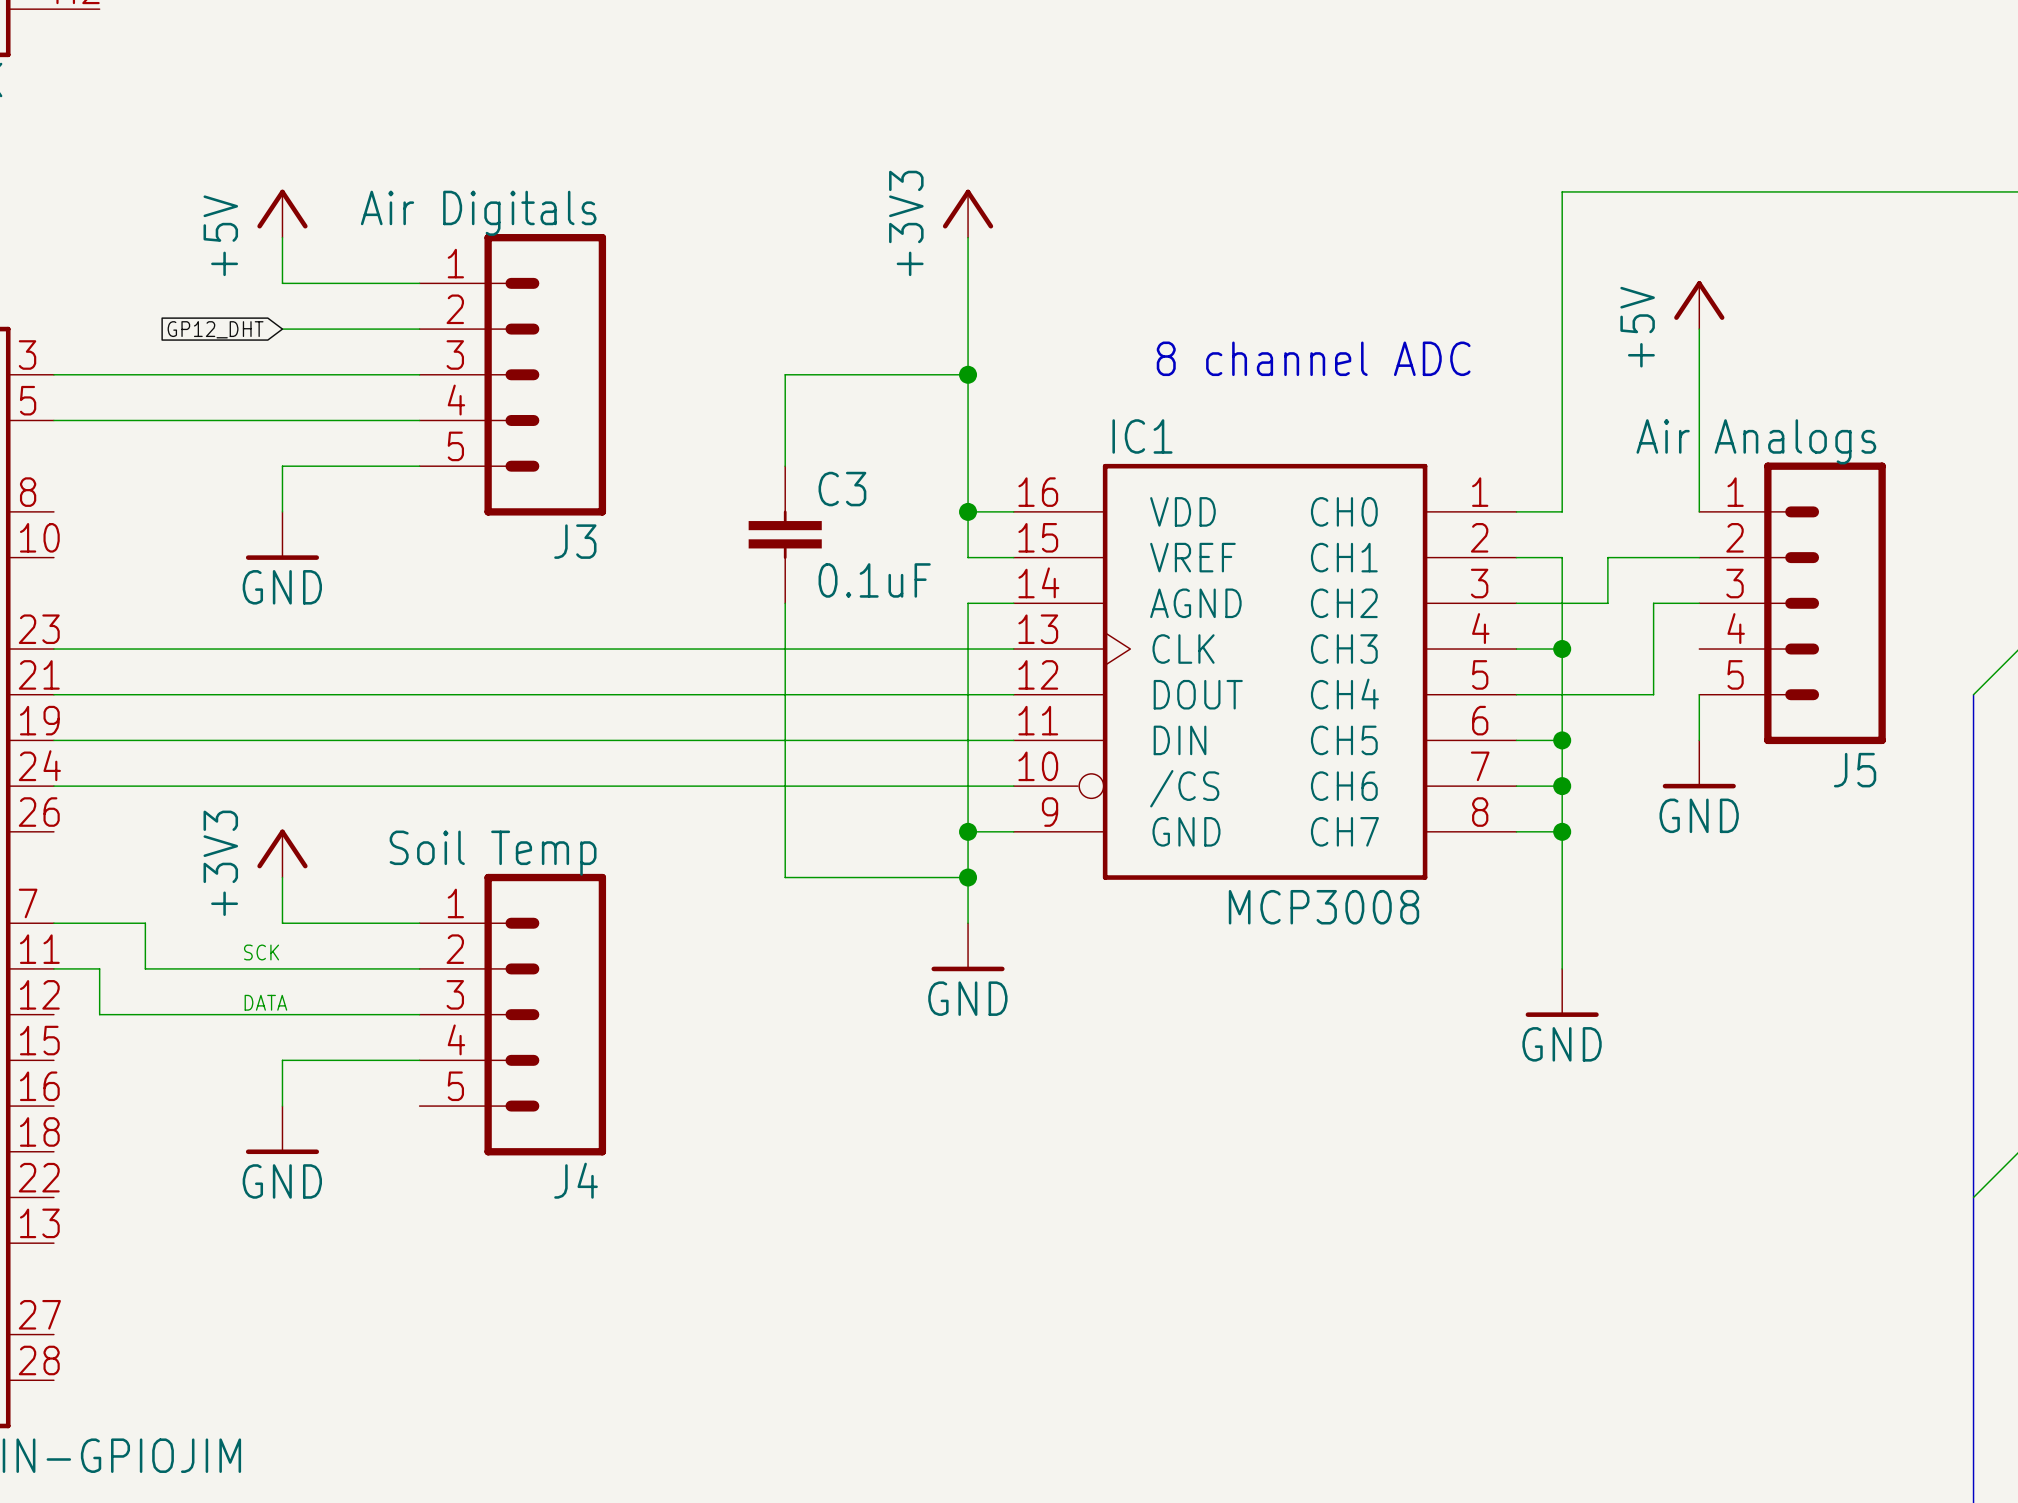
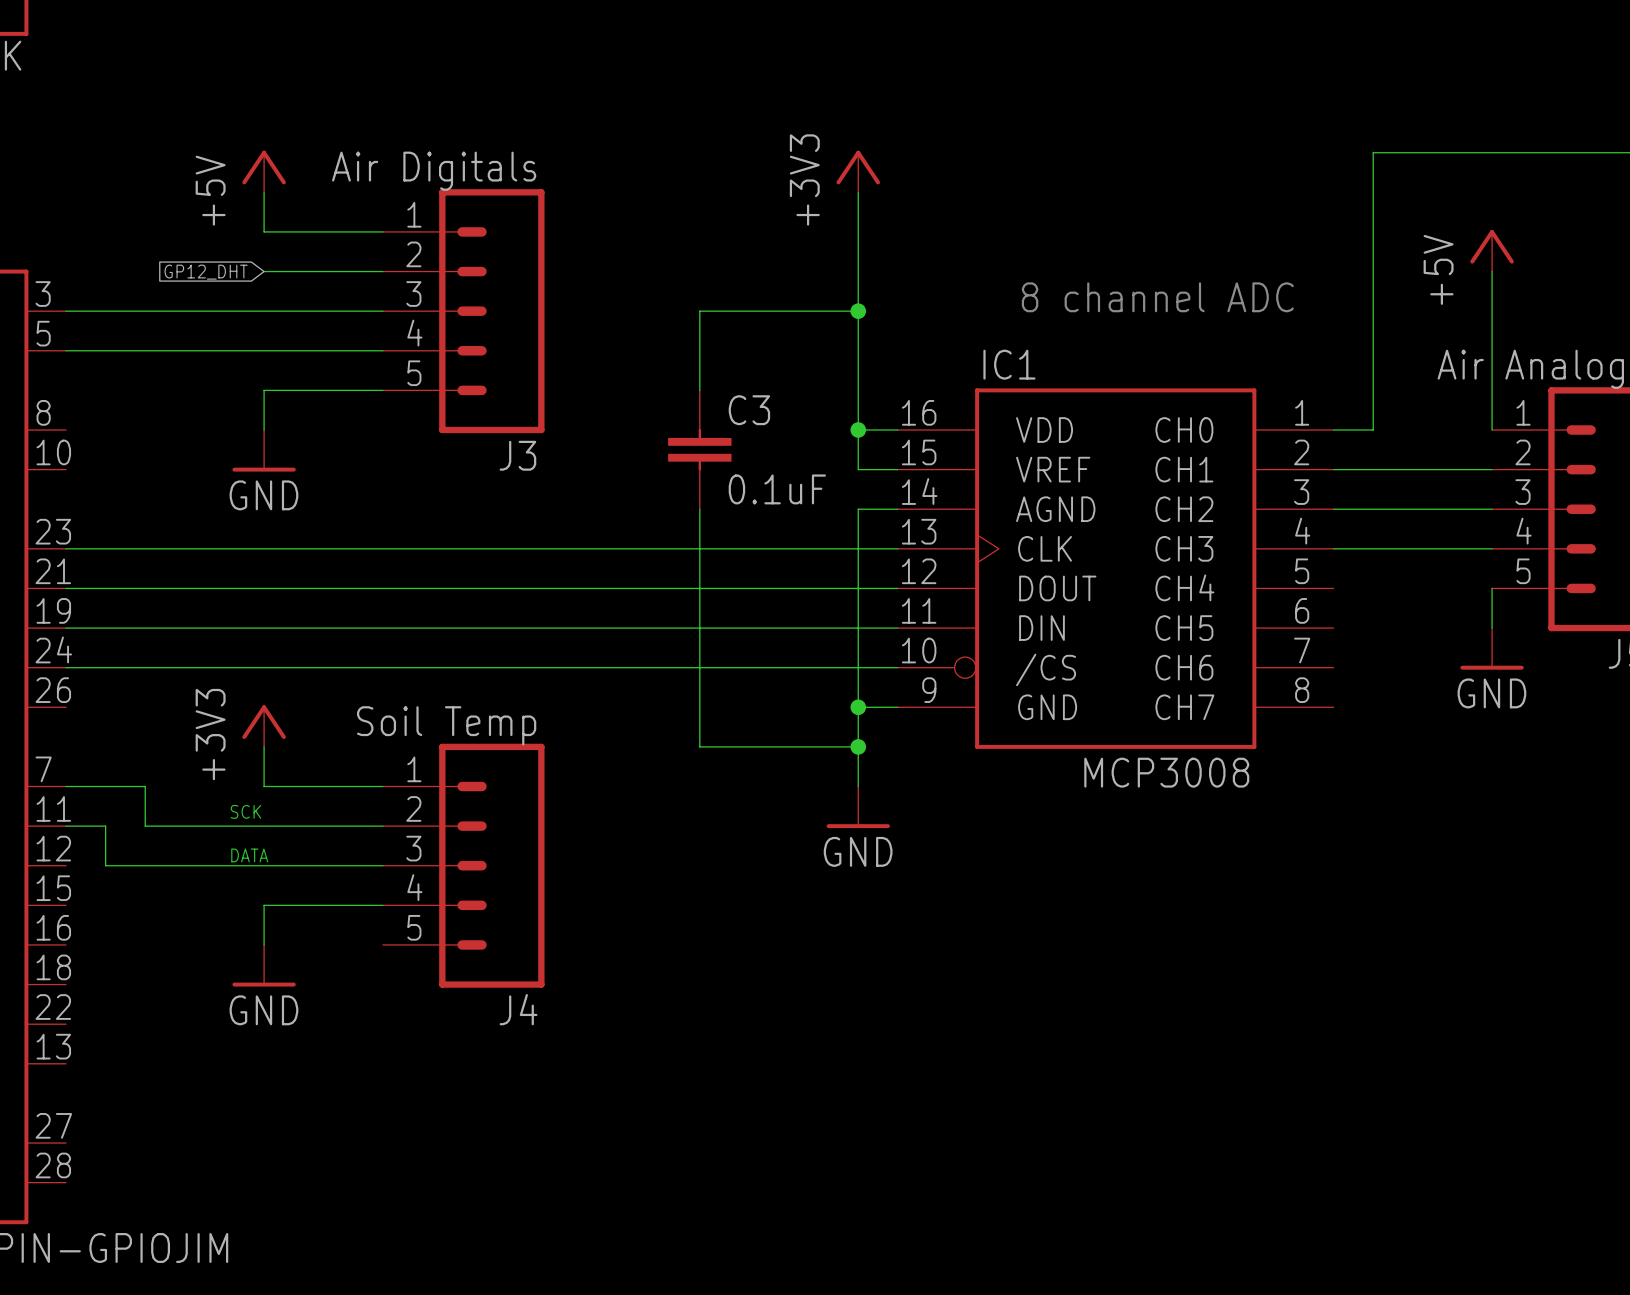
wire: (1562, 557) (1562, 968) -> none
wire: (1607, 557) (1607, 603) -> (1412, 469) (1373, 469)
wire: (1653, 603) (1653, 694) (1516, 694) -> (1452, 509) (1412, 509)
wire: none -> (1373, 548) (1492, 548)
junction: (1562, 649) -> none
wire: (1516, 740) (1562, 740) -> none
junction: (1562, 740) -> none
wire: (1516, 786) (1562, 786) -> none
junction: (1562, 786) -> none
wire: (1516, 831) (1562, 831) -> none
junction: (1562, 831) -> none
power symbol: GND (1562, 992) -> none

